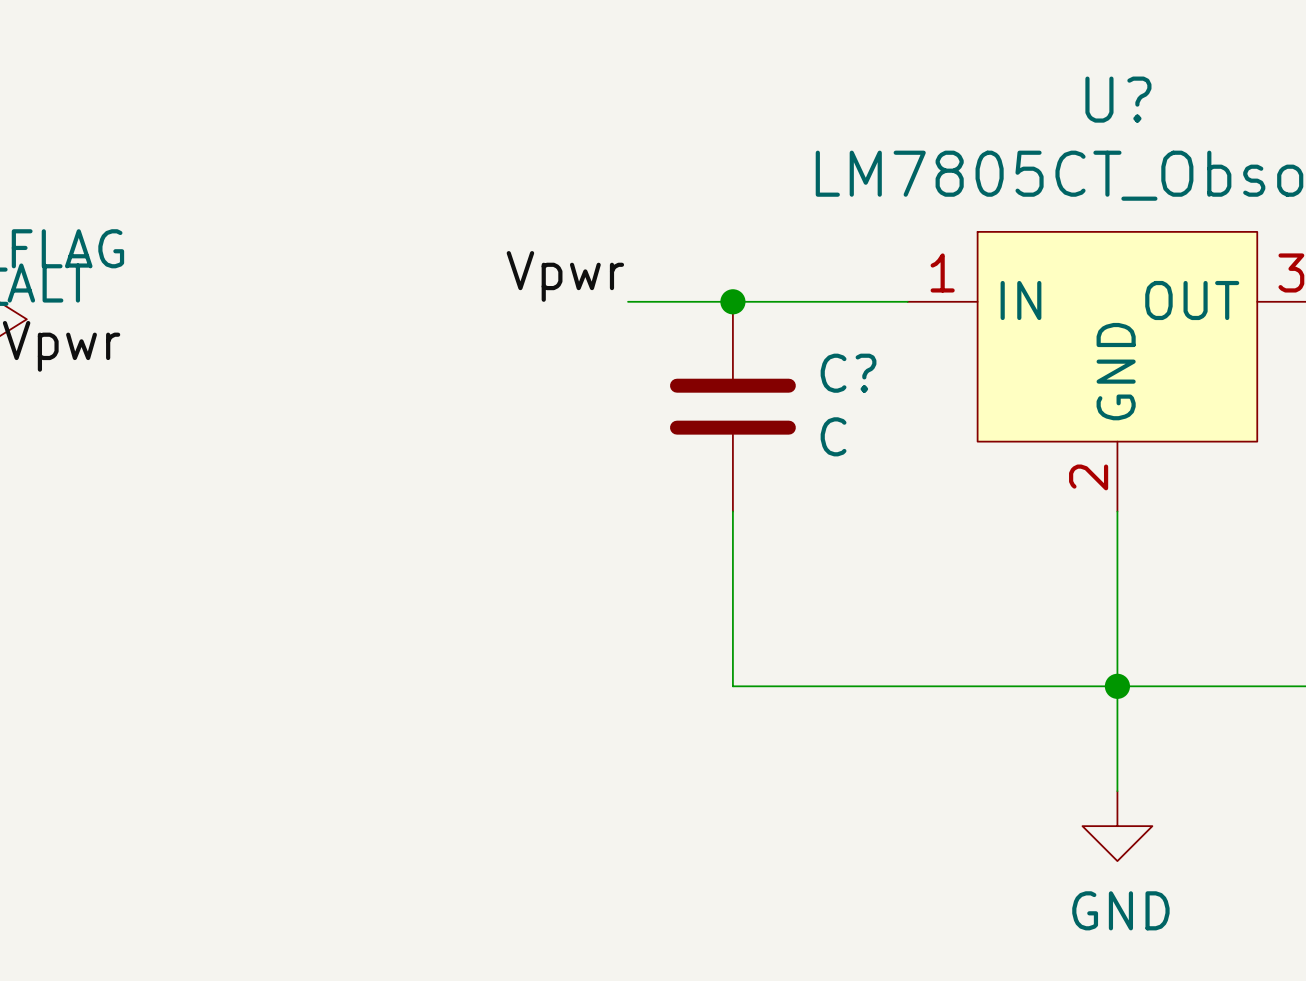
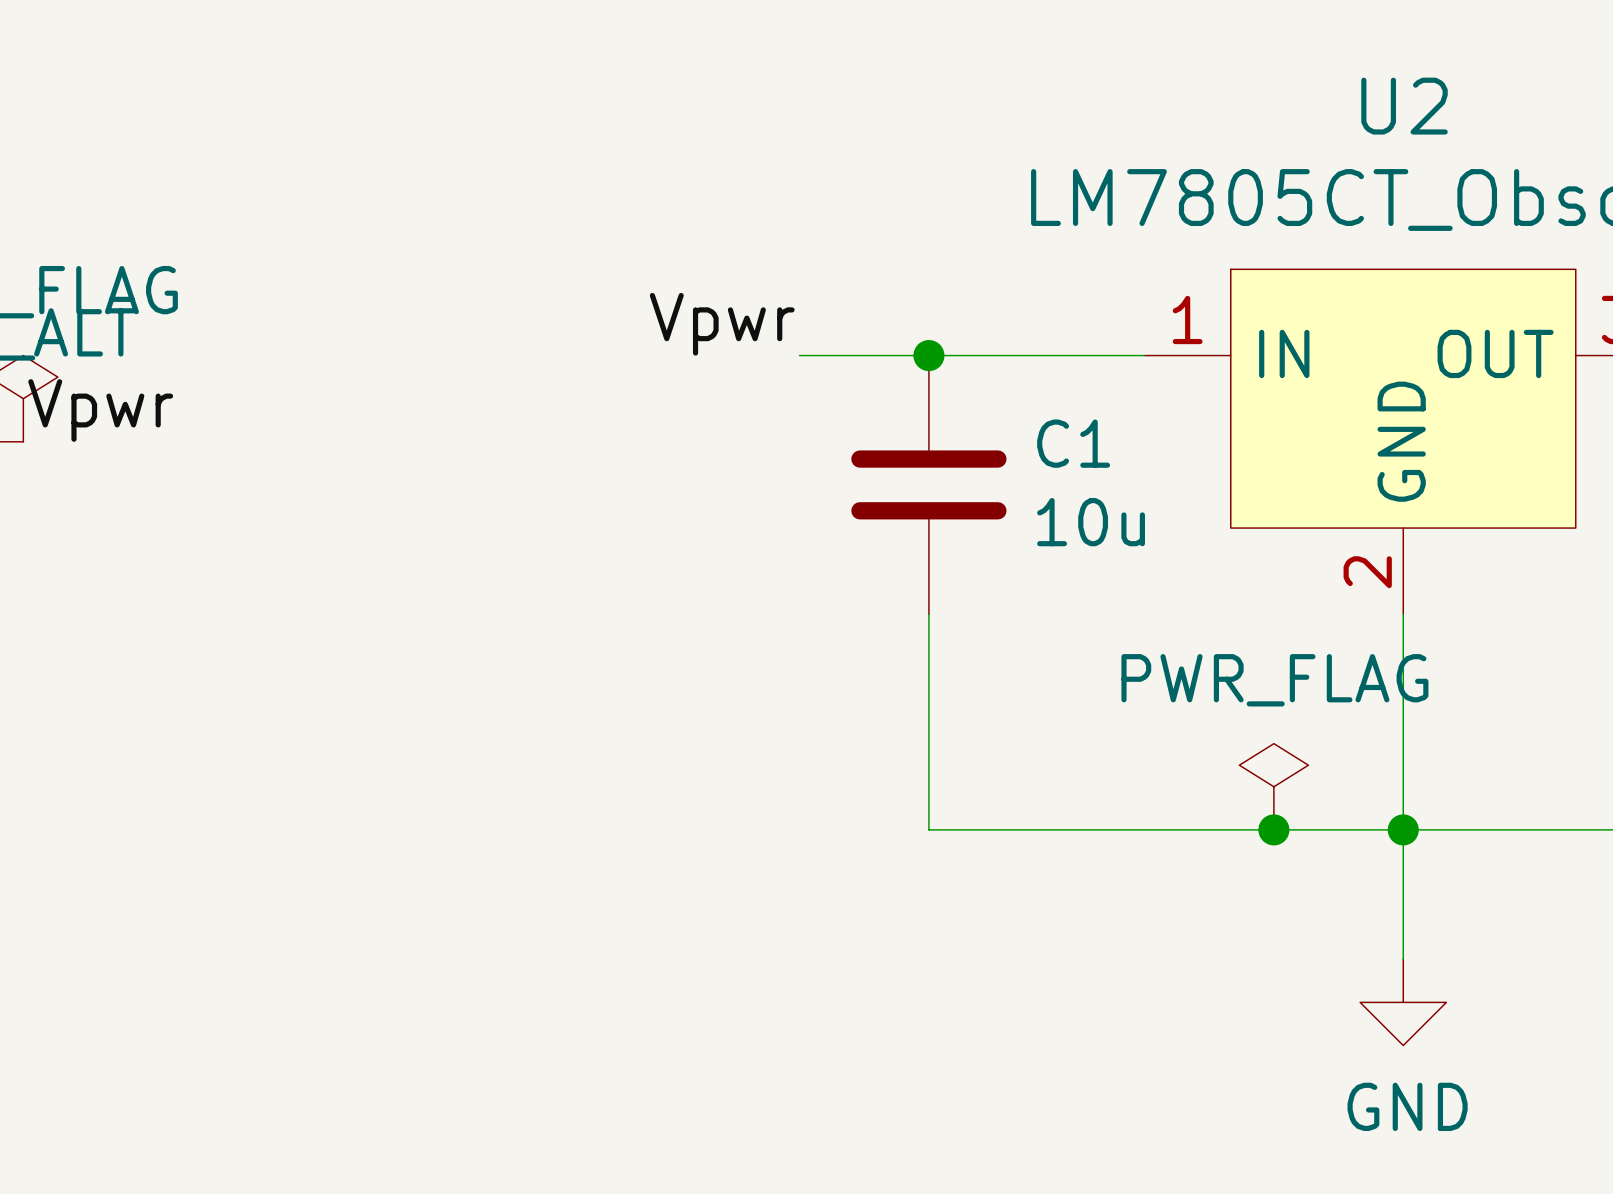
U? name: U? (1118, 99) -> U2 (1404, 106)
C? name: C? (848, 373) -> C1 (1073, 443)
C? value: C (833, 436) -> 10u (1091, 522)
power symbol: none -> PWR_FLAG (1273, 786)
junction: none -> (1273, 829)

